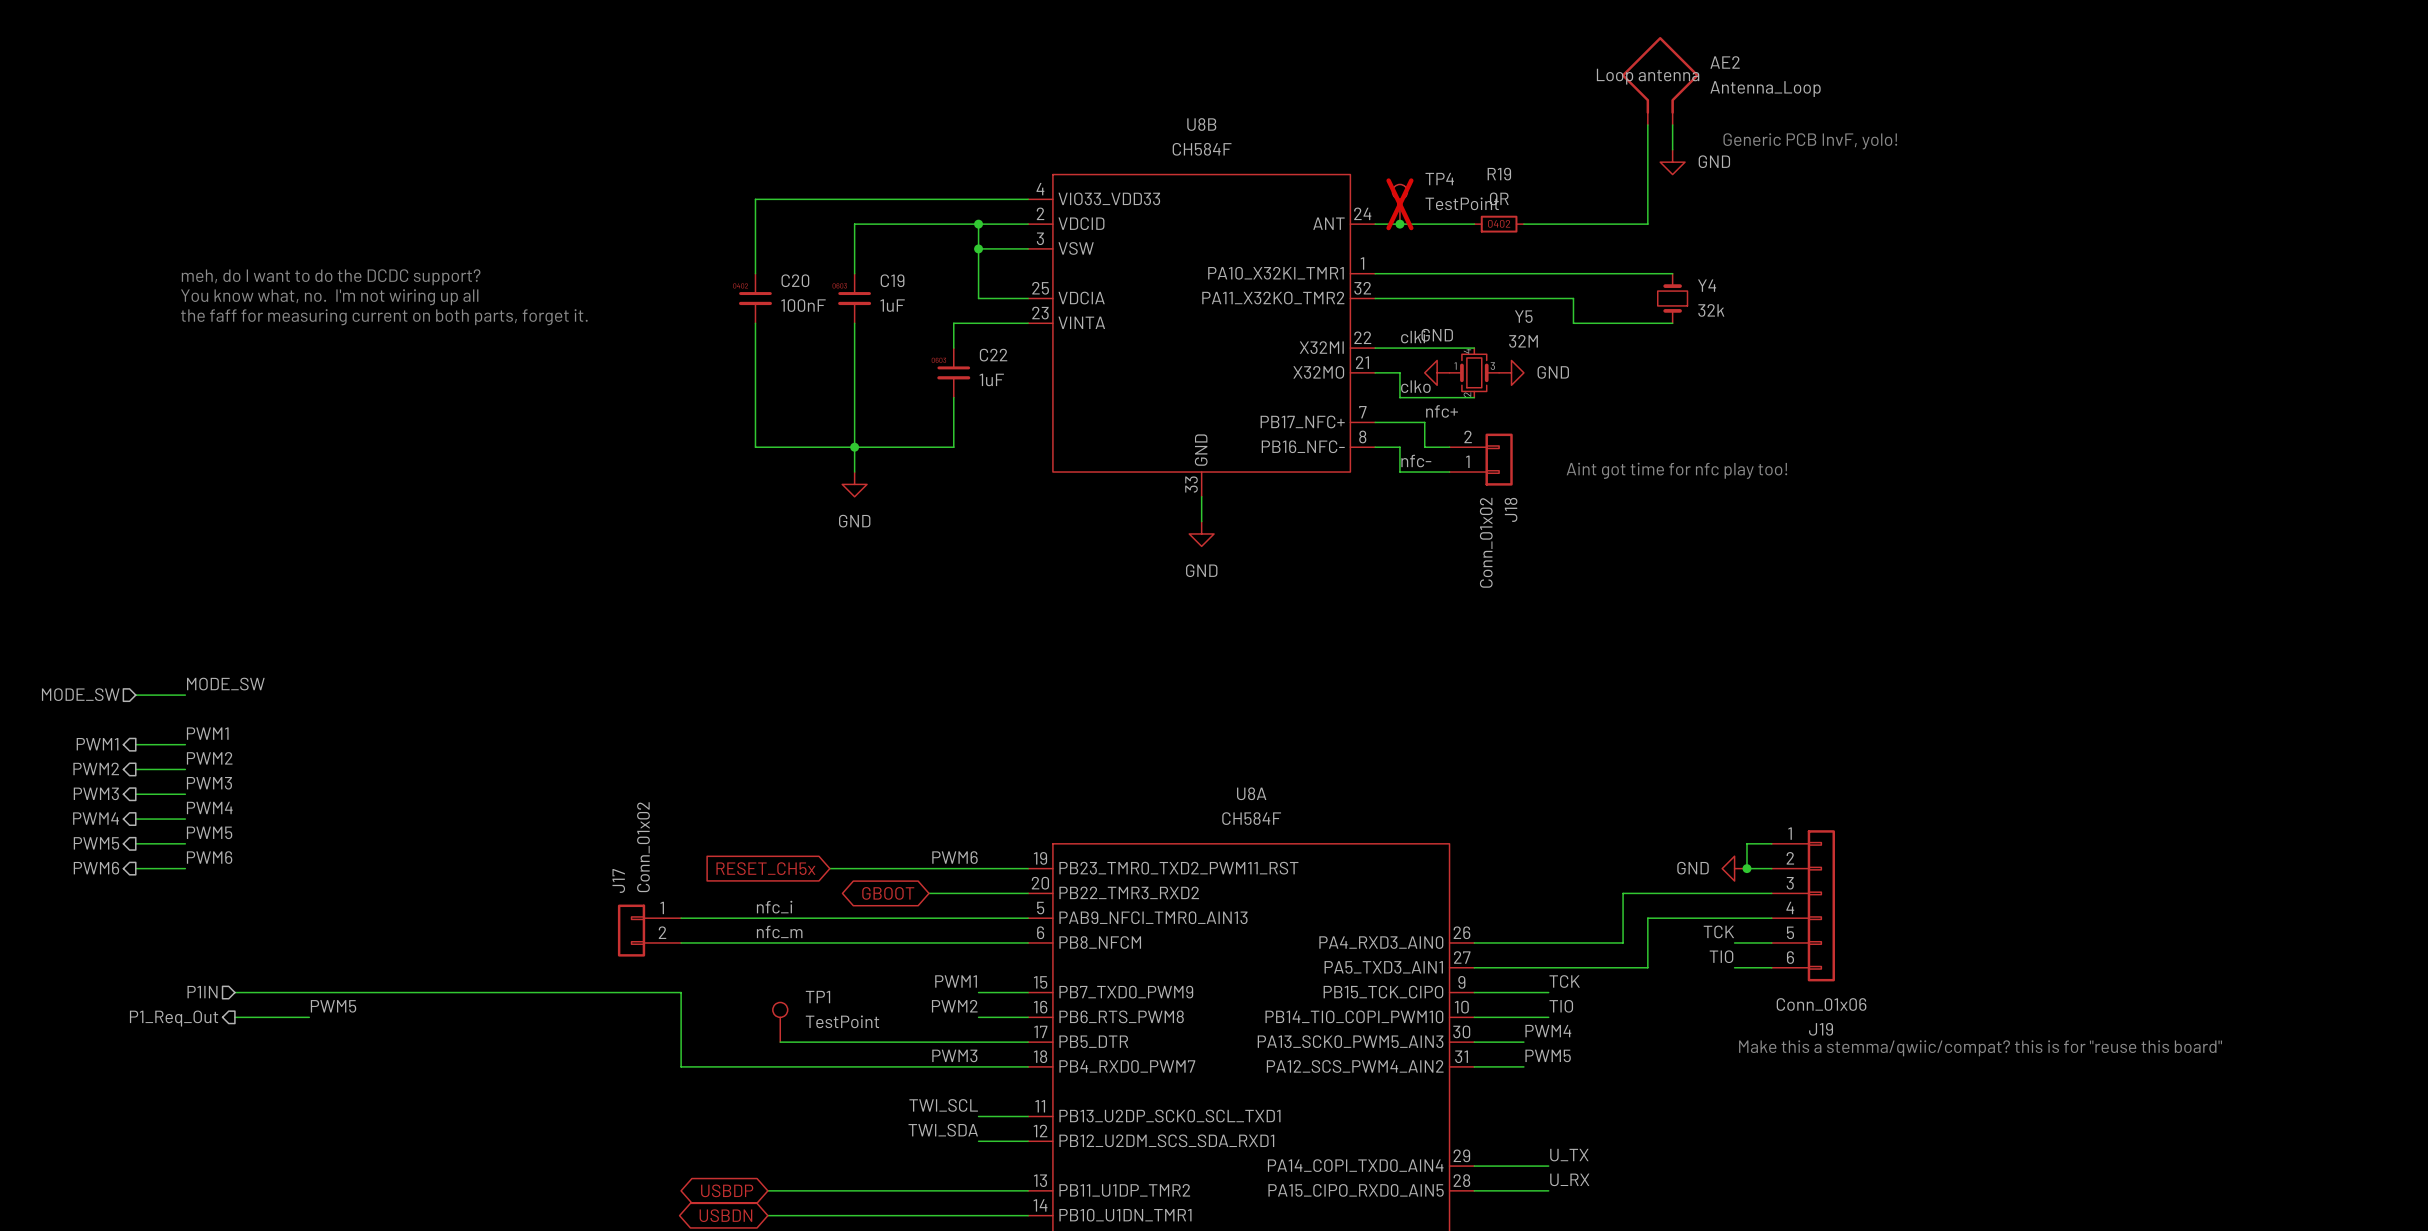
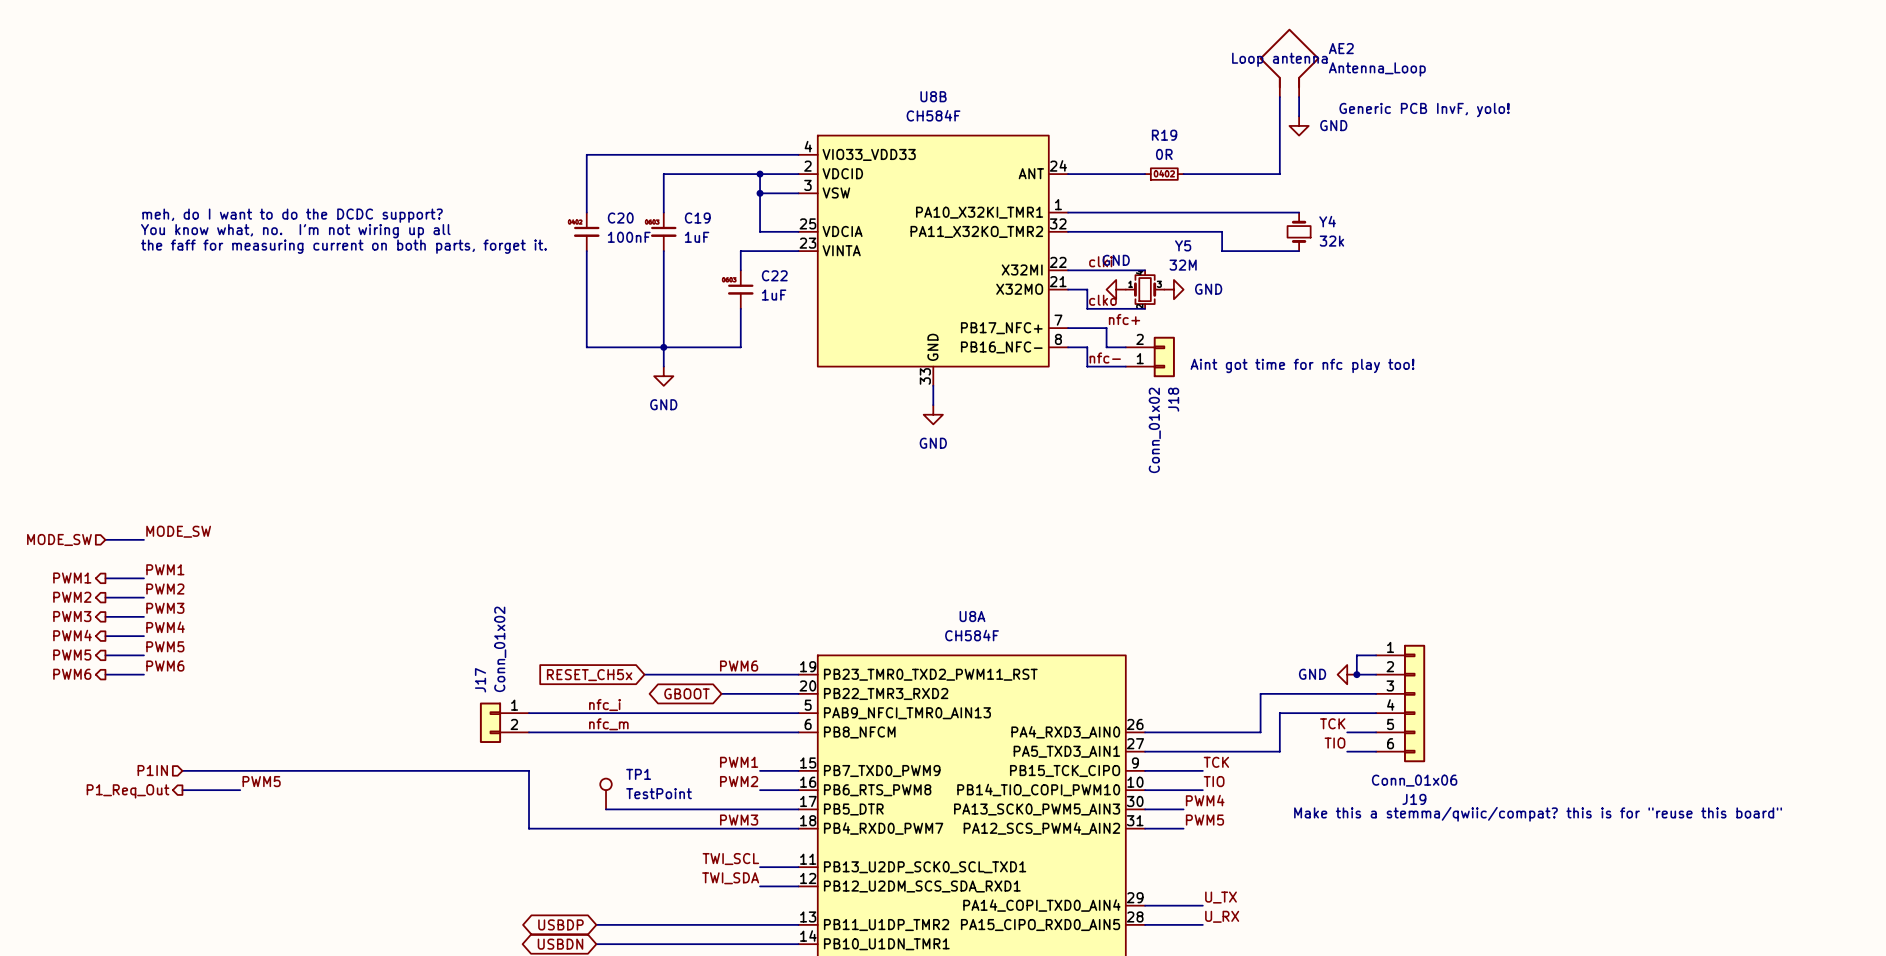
TP4: TestPoint (1399, 204) -> none
junction: (1399, 224) -> none

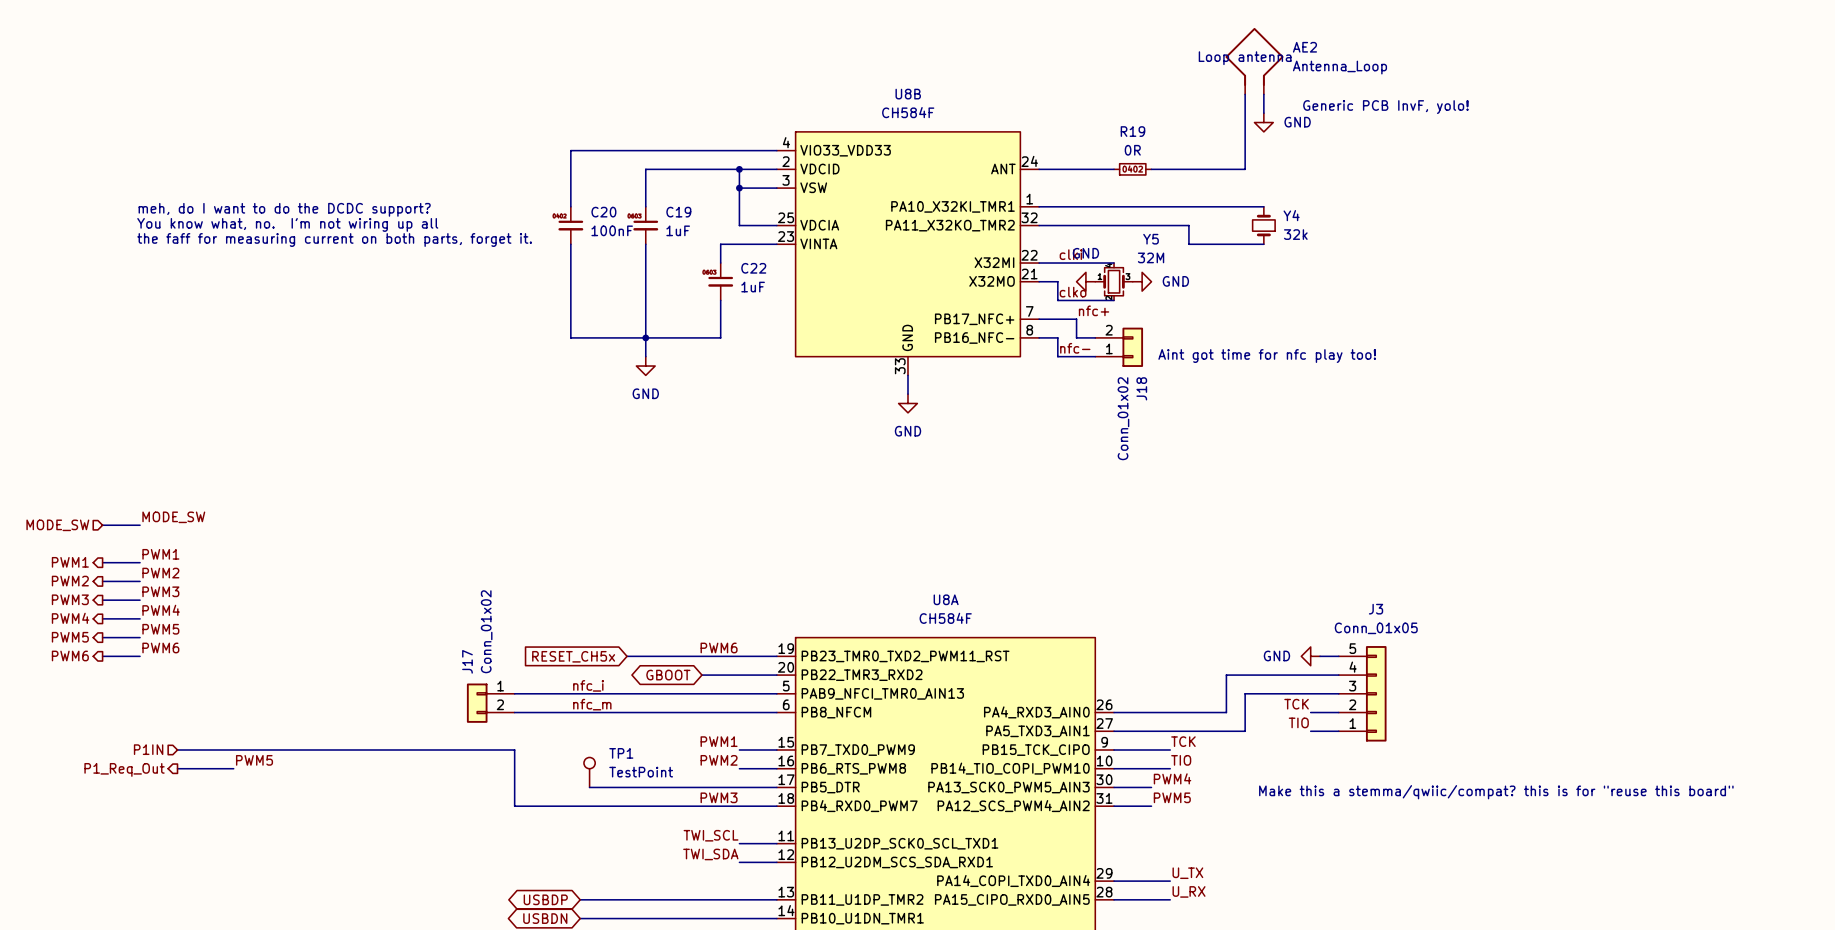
wire: (1376, 655) (1356, 655) (1356, 674) -> none
junction: (1356, 674) -> none
J19: Conn_01x06 (1400, 703) -> none
J3: none -> Conn_01x05 (1362, 693)

